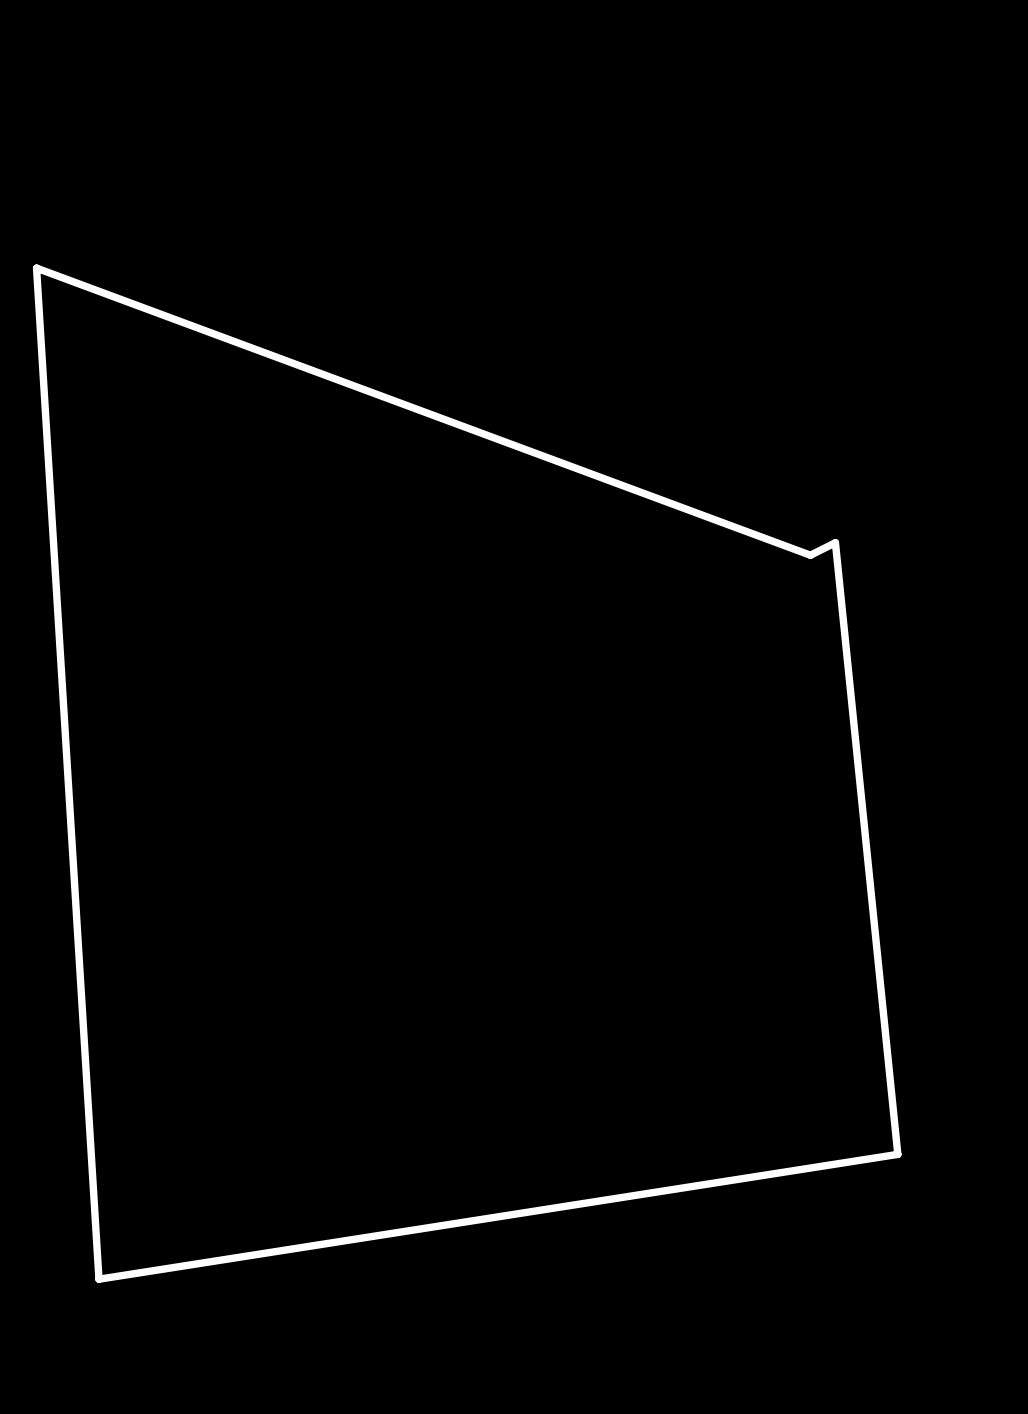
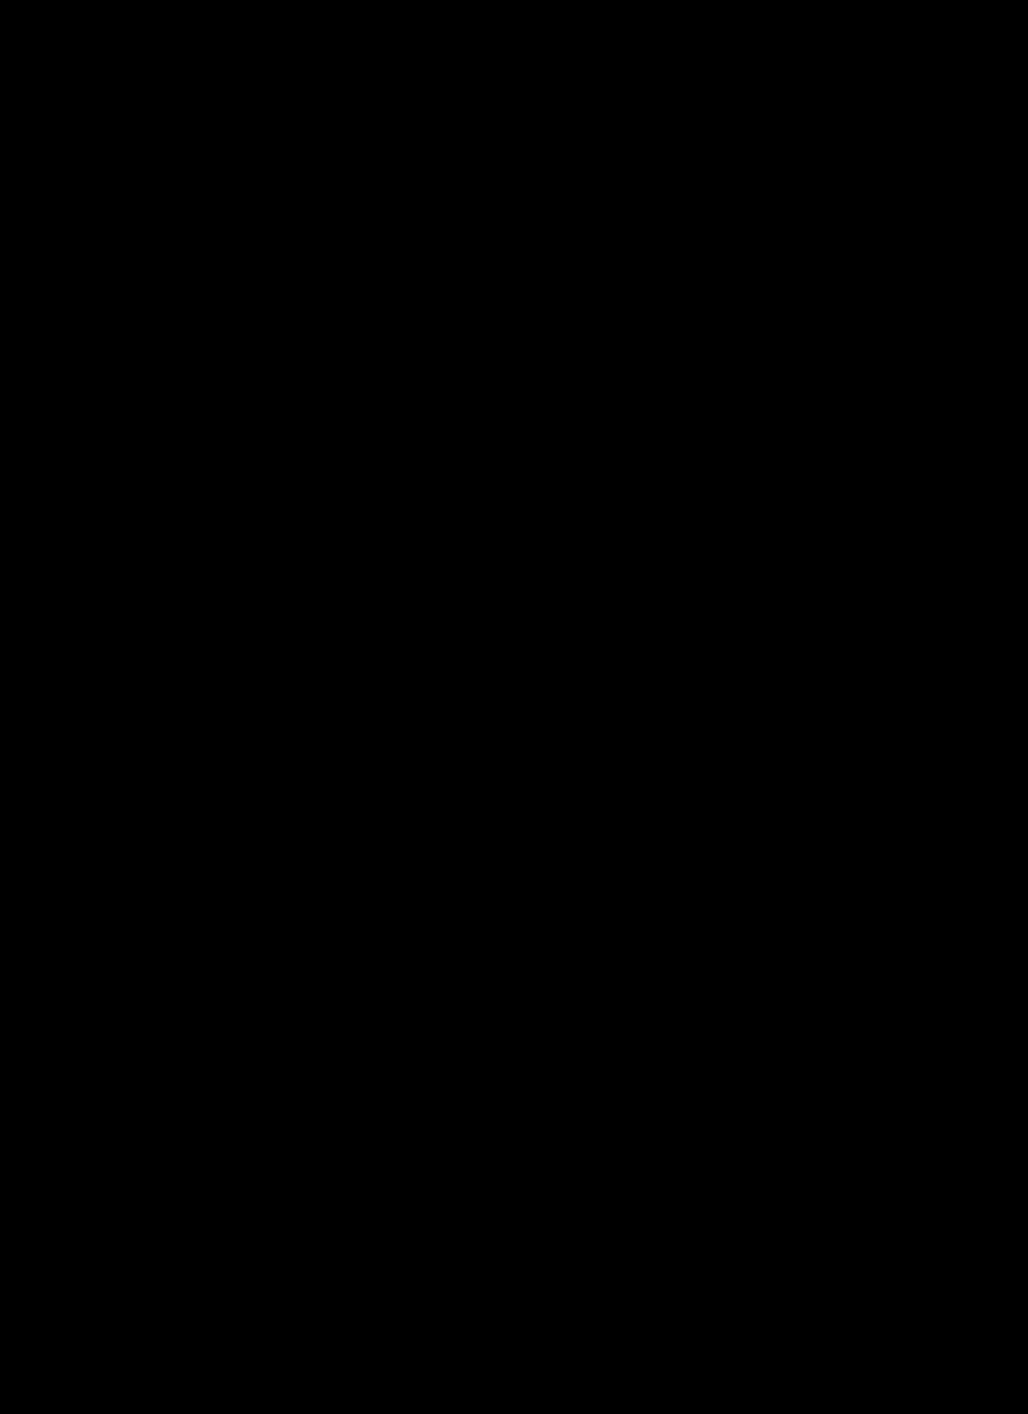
board edge: (36, 268) (98, 1279) (897, 1154) (835, 542) (810, 555) (36, 268) -> none

